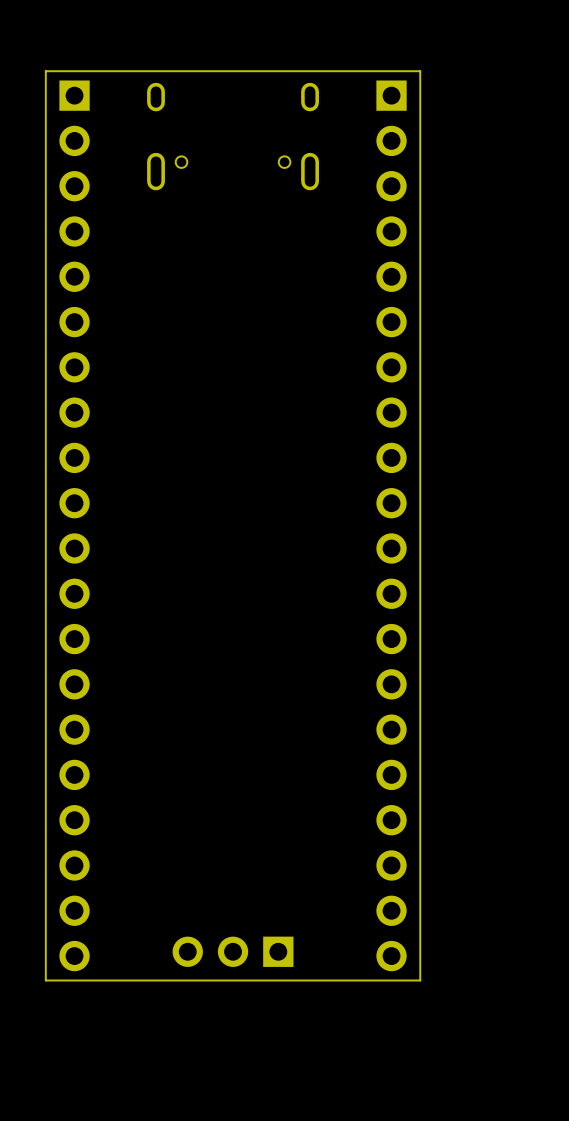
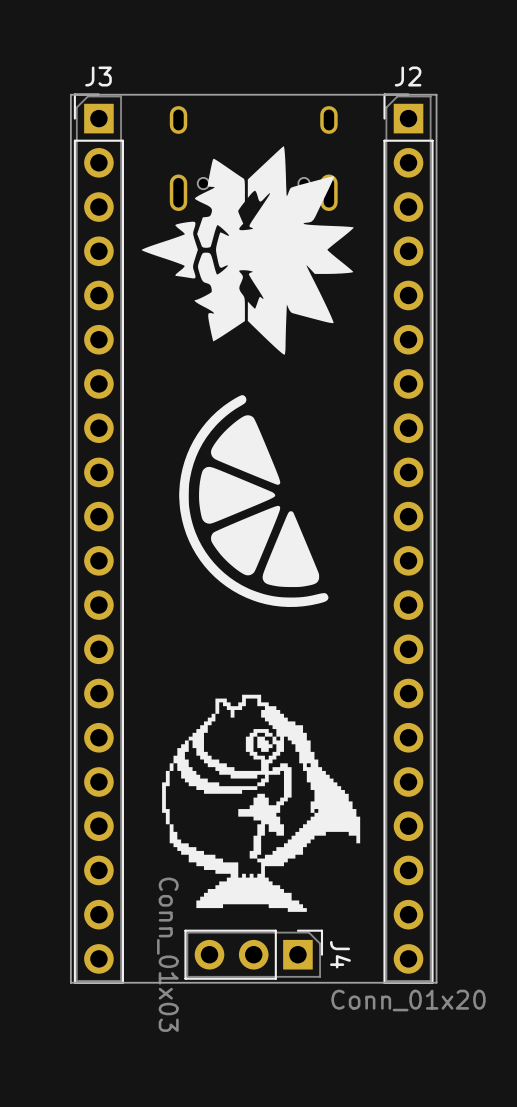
drawing: none -> [141, 146, 354, 355]
drawing: none -> [179, 395, 329, 608]
J3 side: top (74, 525) -> bottom (98, 538)
J2 side: top (391, 525) -> bottom (408, 538)
drawing: none -> [162, 694, 361, 912]
J4 side: top (233, 951) -> bottom (253, 954)

